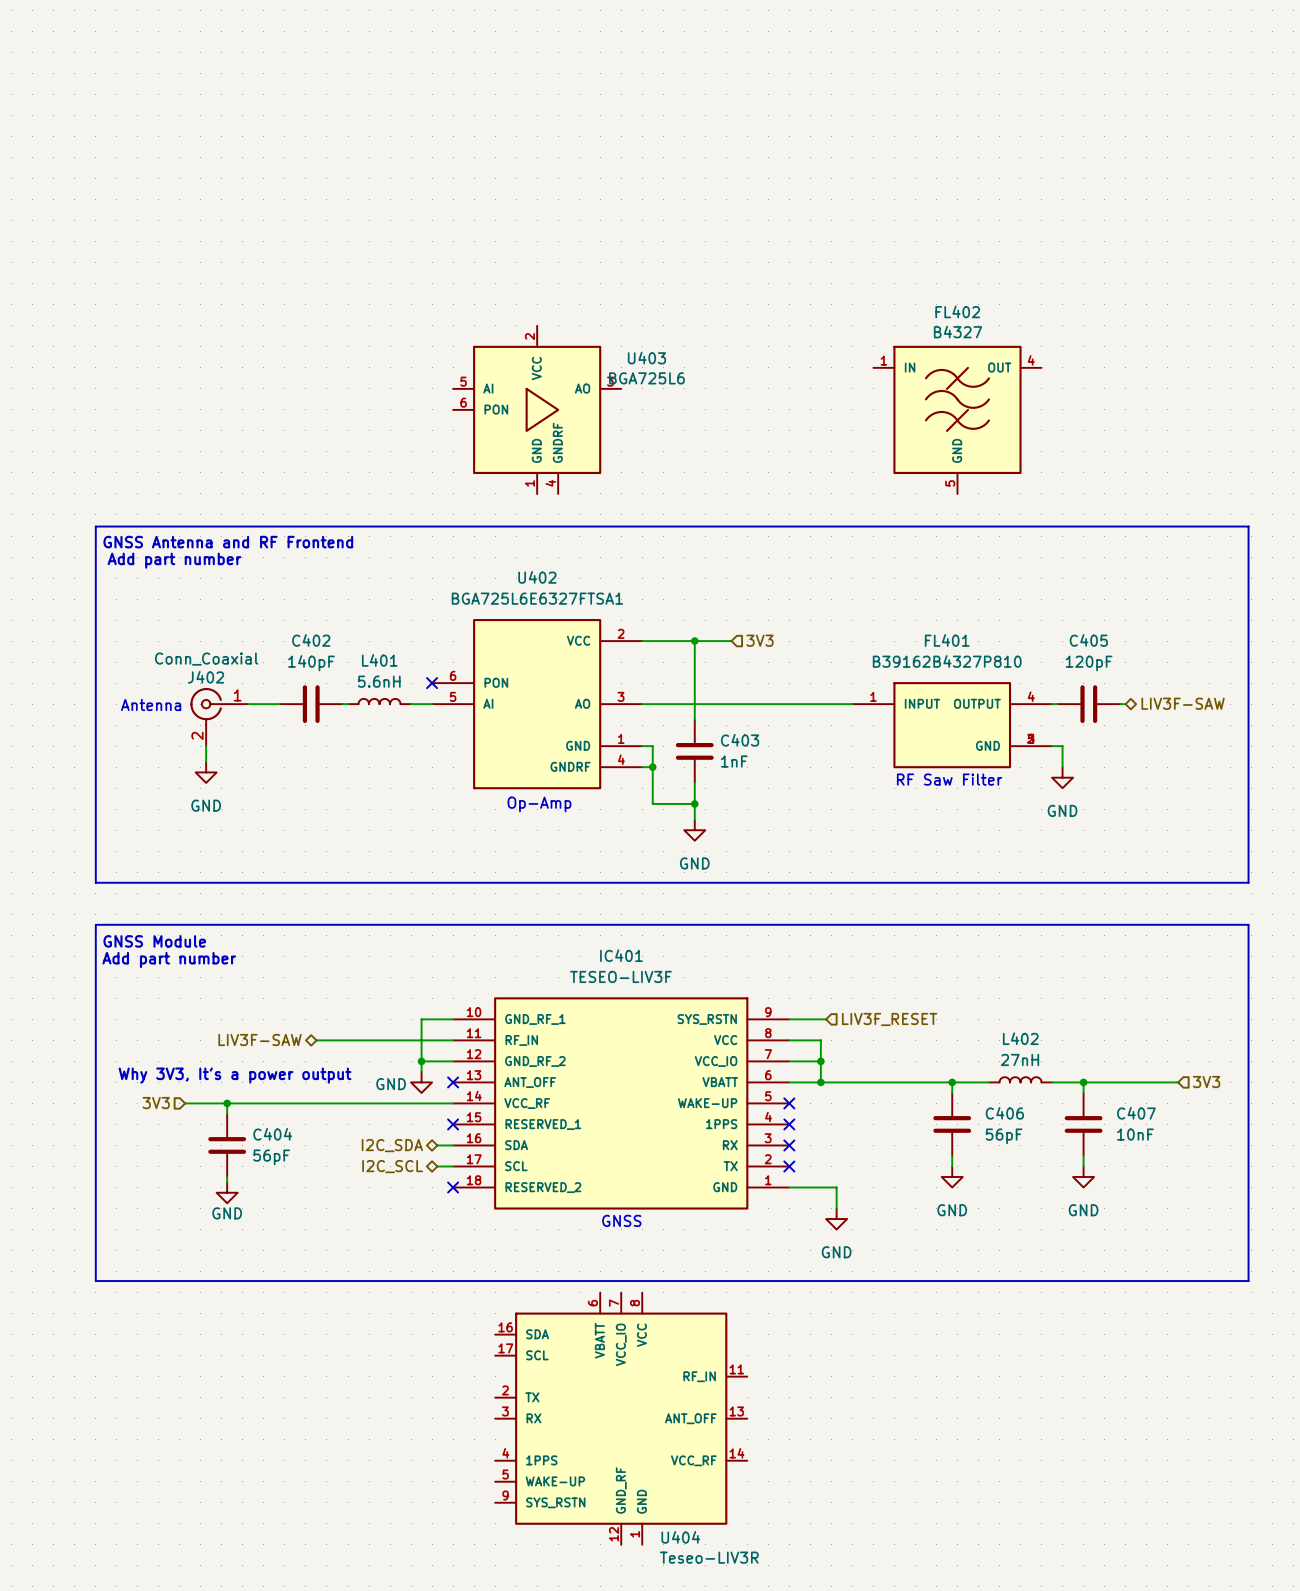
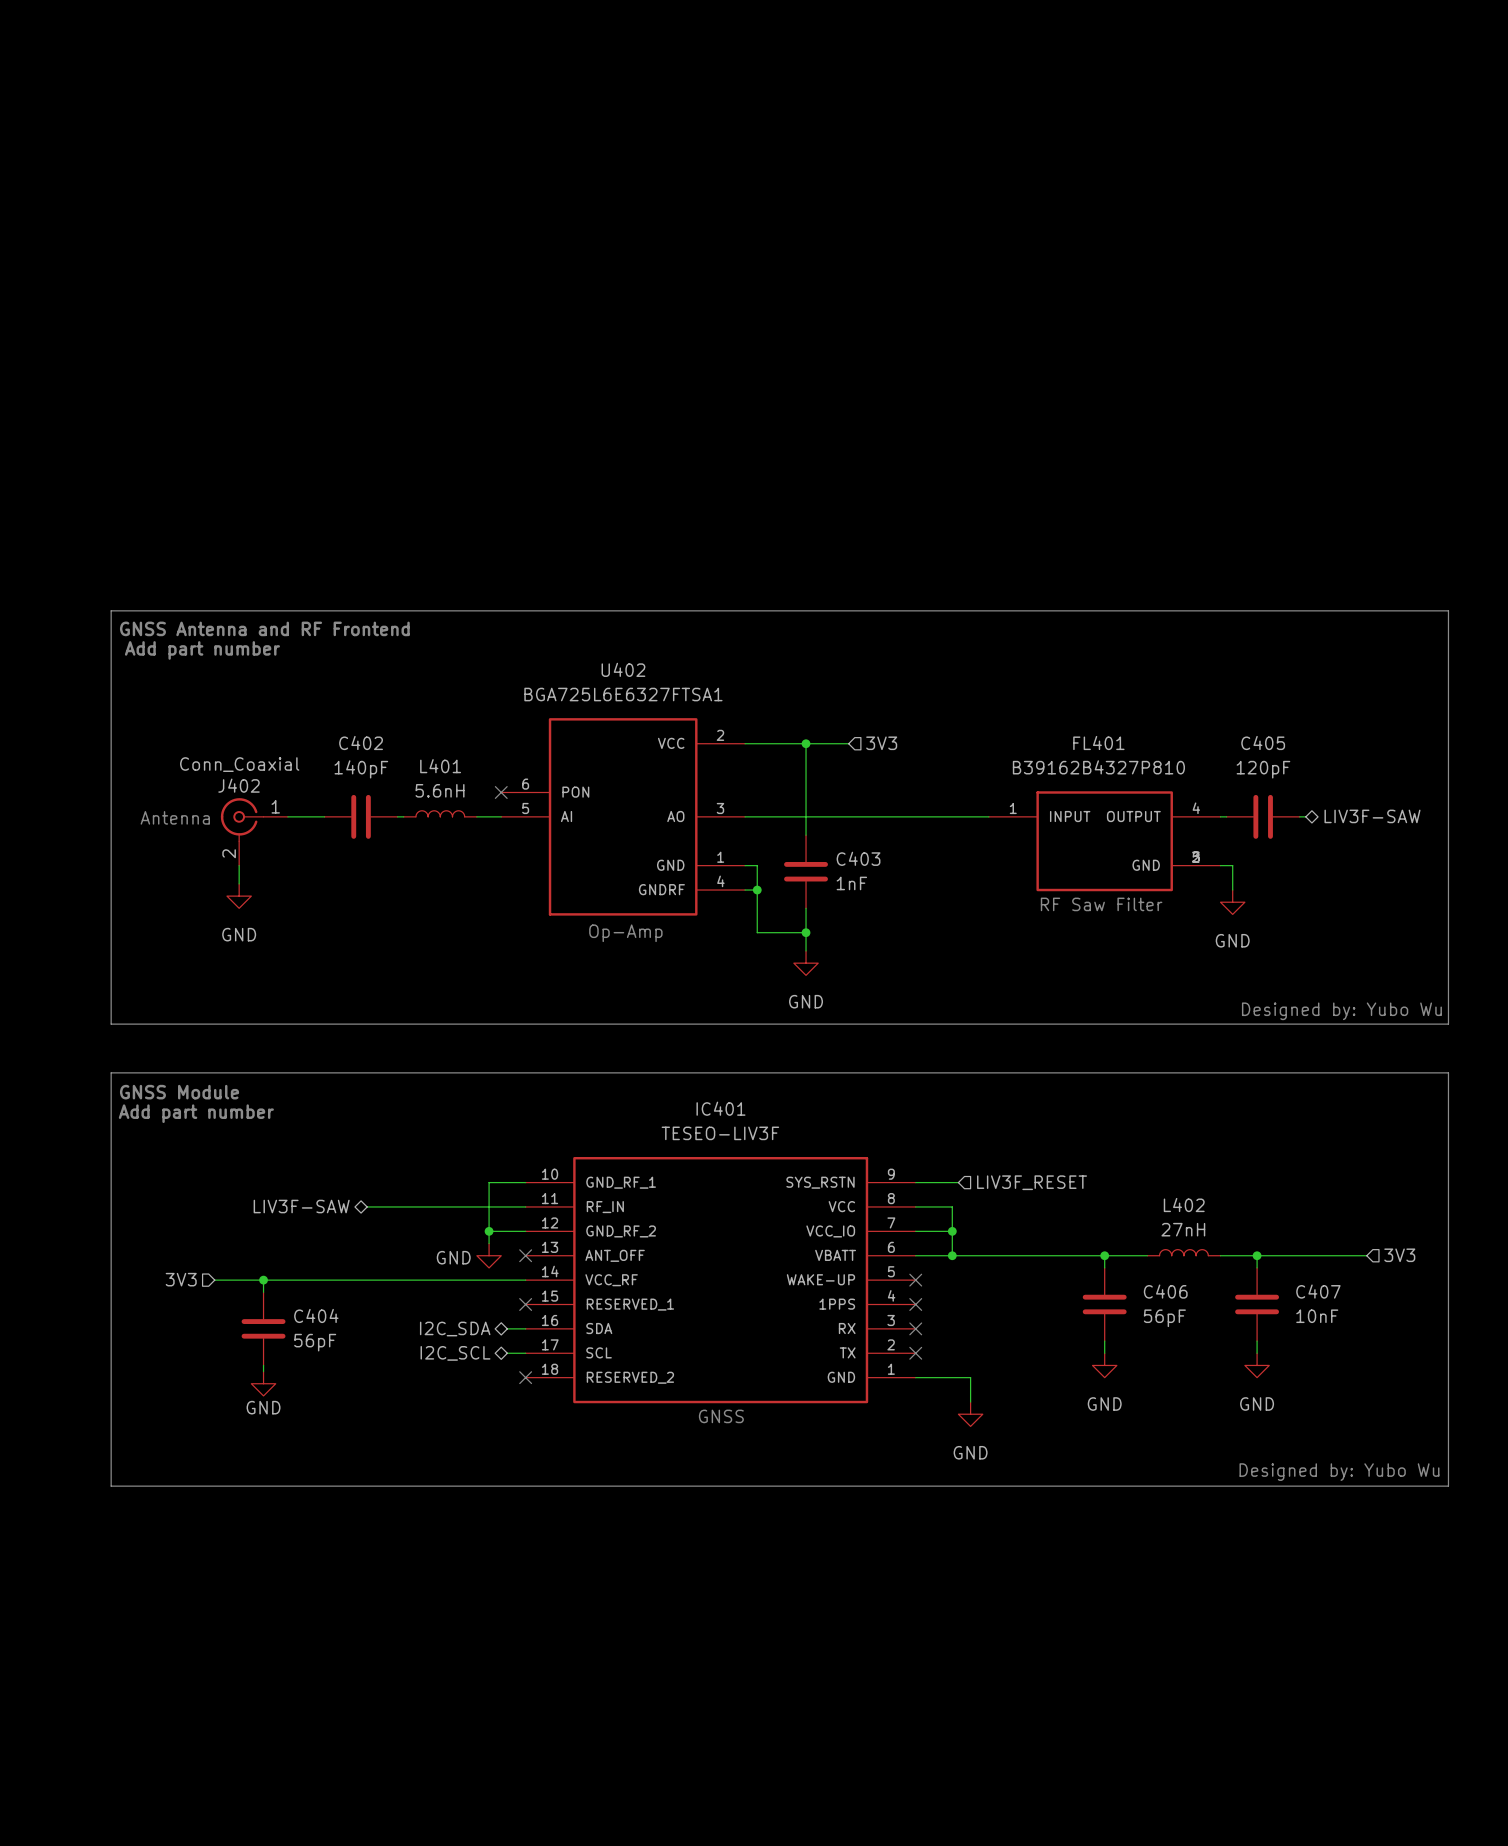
U403: BGA725L6 (537, 409) -> none
FL402: B4327 (957, 419) -> none
text: none -> Designed by: Yubo Wu (1341, 1011)
text: Why 3V3, It's a power output (235, 1075) -> none
text: none -> Designed by: Yubo Wu (1339, 1472)
U404: Teseo-LIV3R (621, 1418) -> none

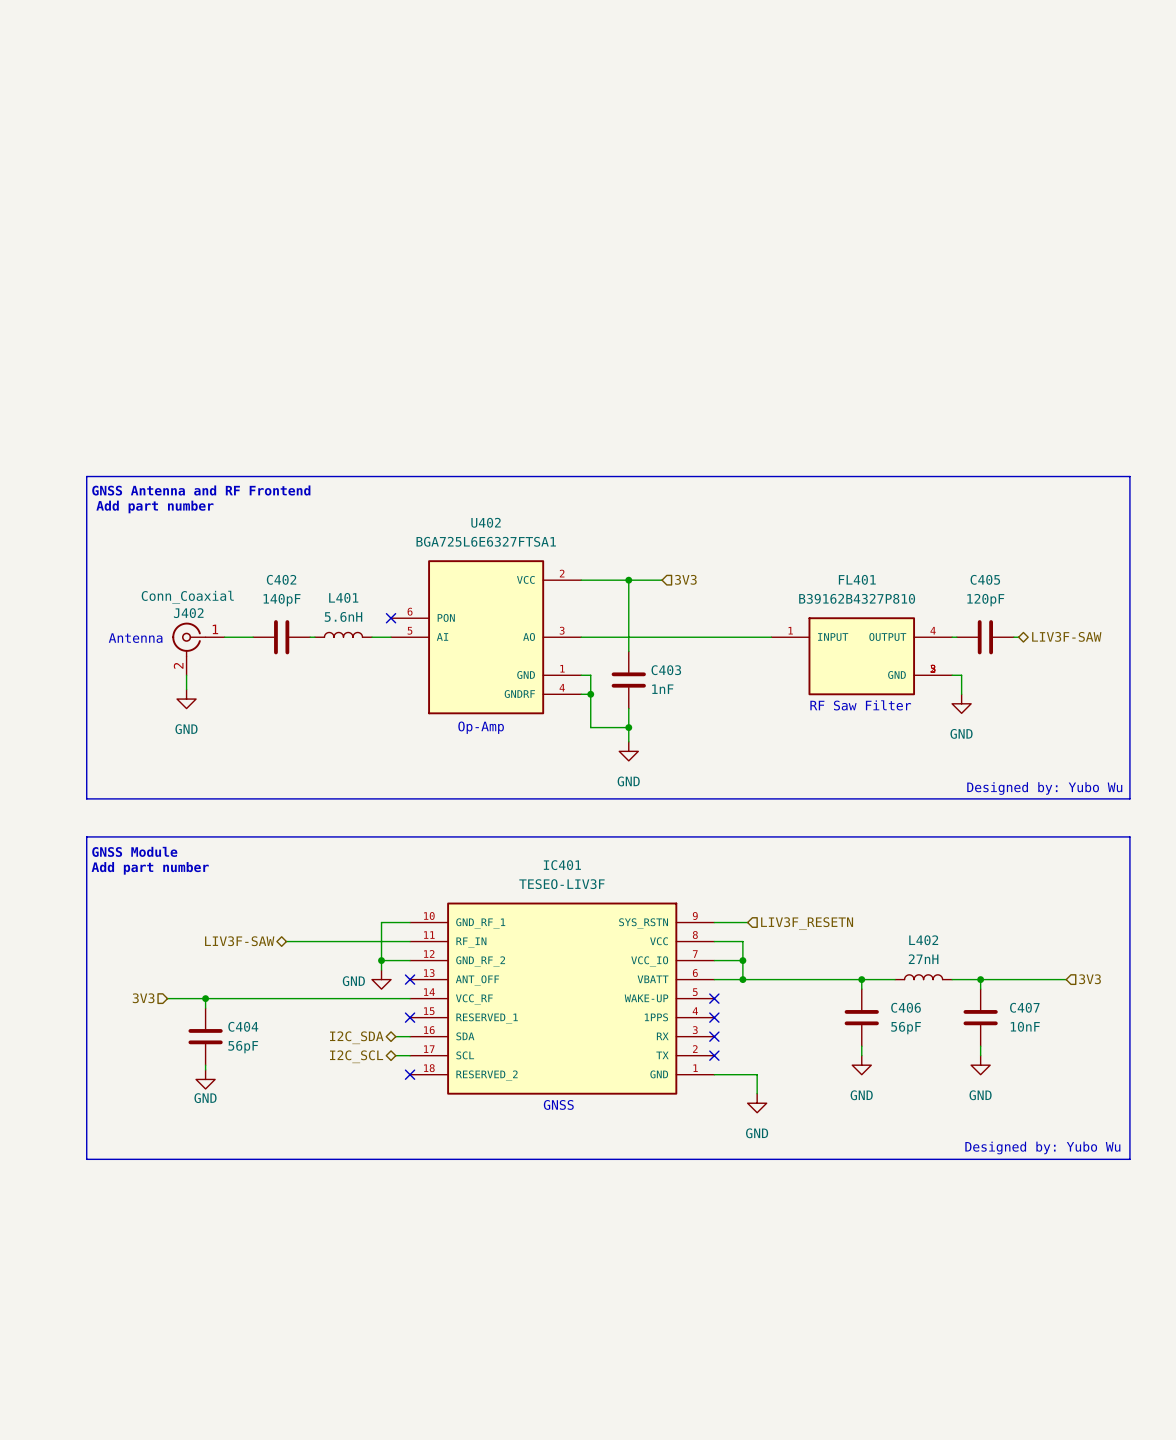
hierarchical label: LIV3F_RESET (1032, 1182) -> LIV3F_RESETN (807, 923)

